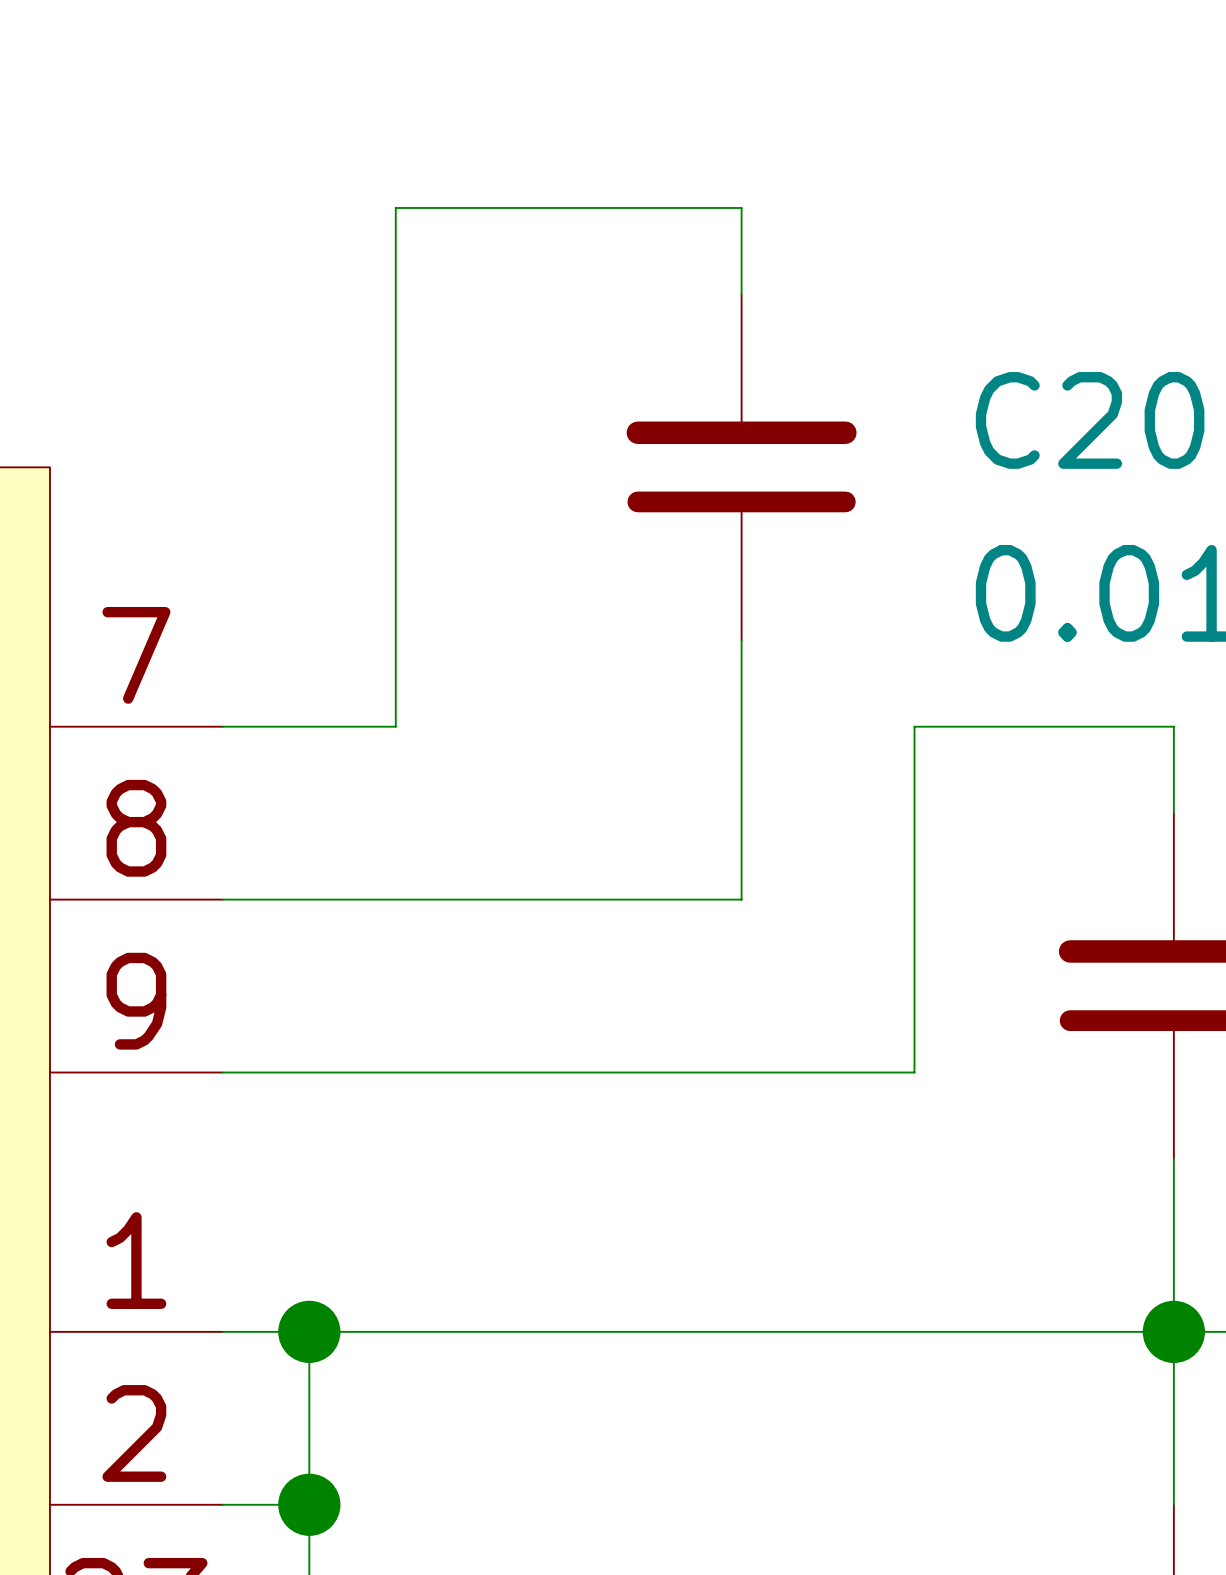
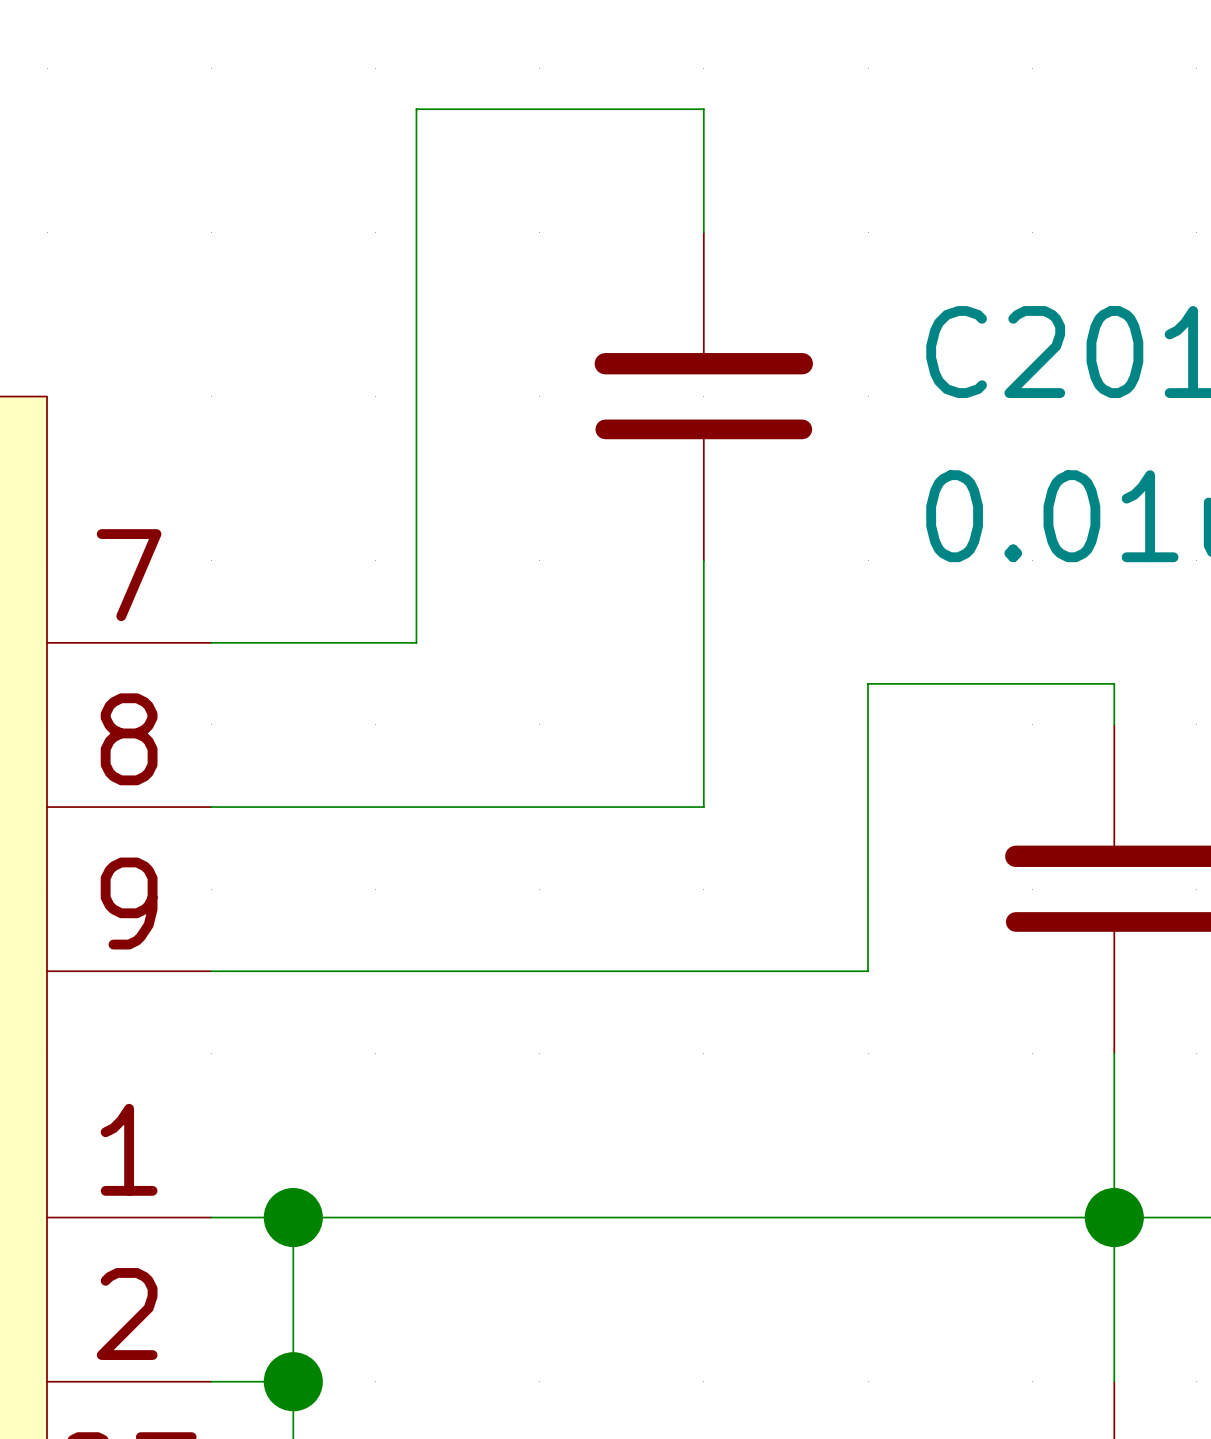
wire: (741, 207) (395, 207) (395, 726) -> (703, 150) (703, 109) (416, 109) (416, 642) (375, 642)
wire: (914, 769) (914, 726) (1173, 726) (1173, 769) -> (868, 683) (1114, 683)

